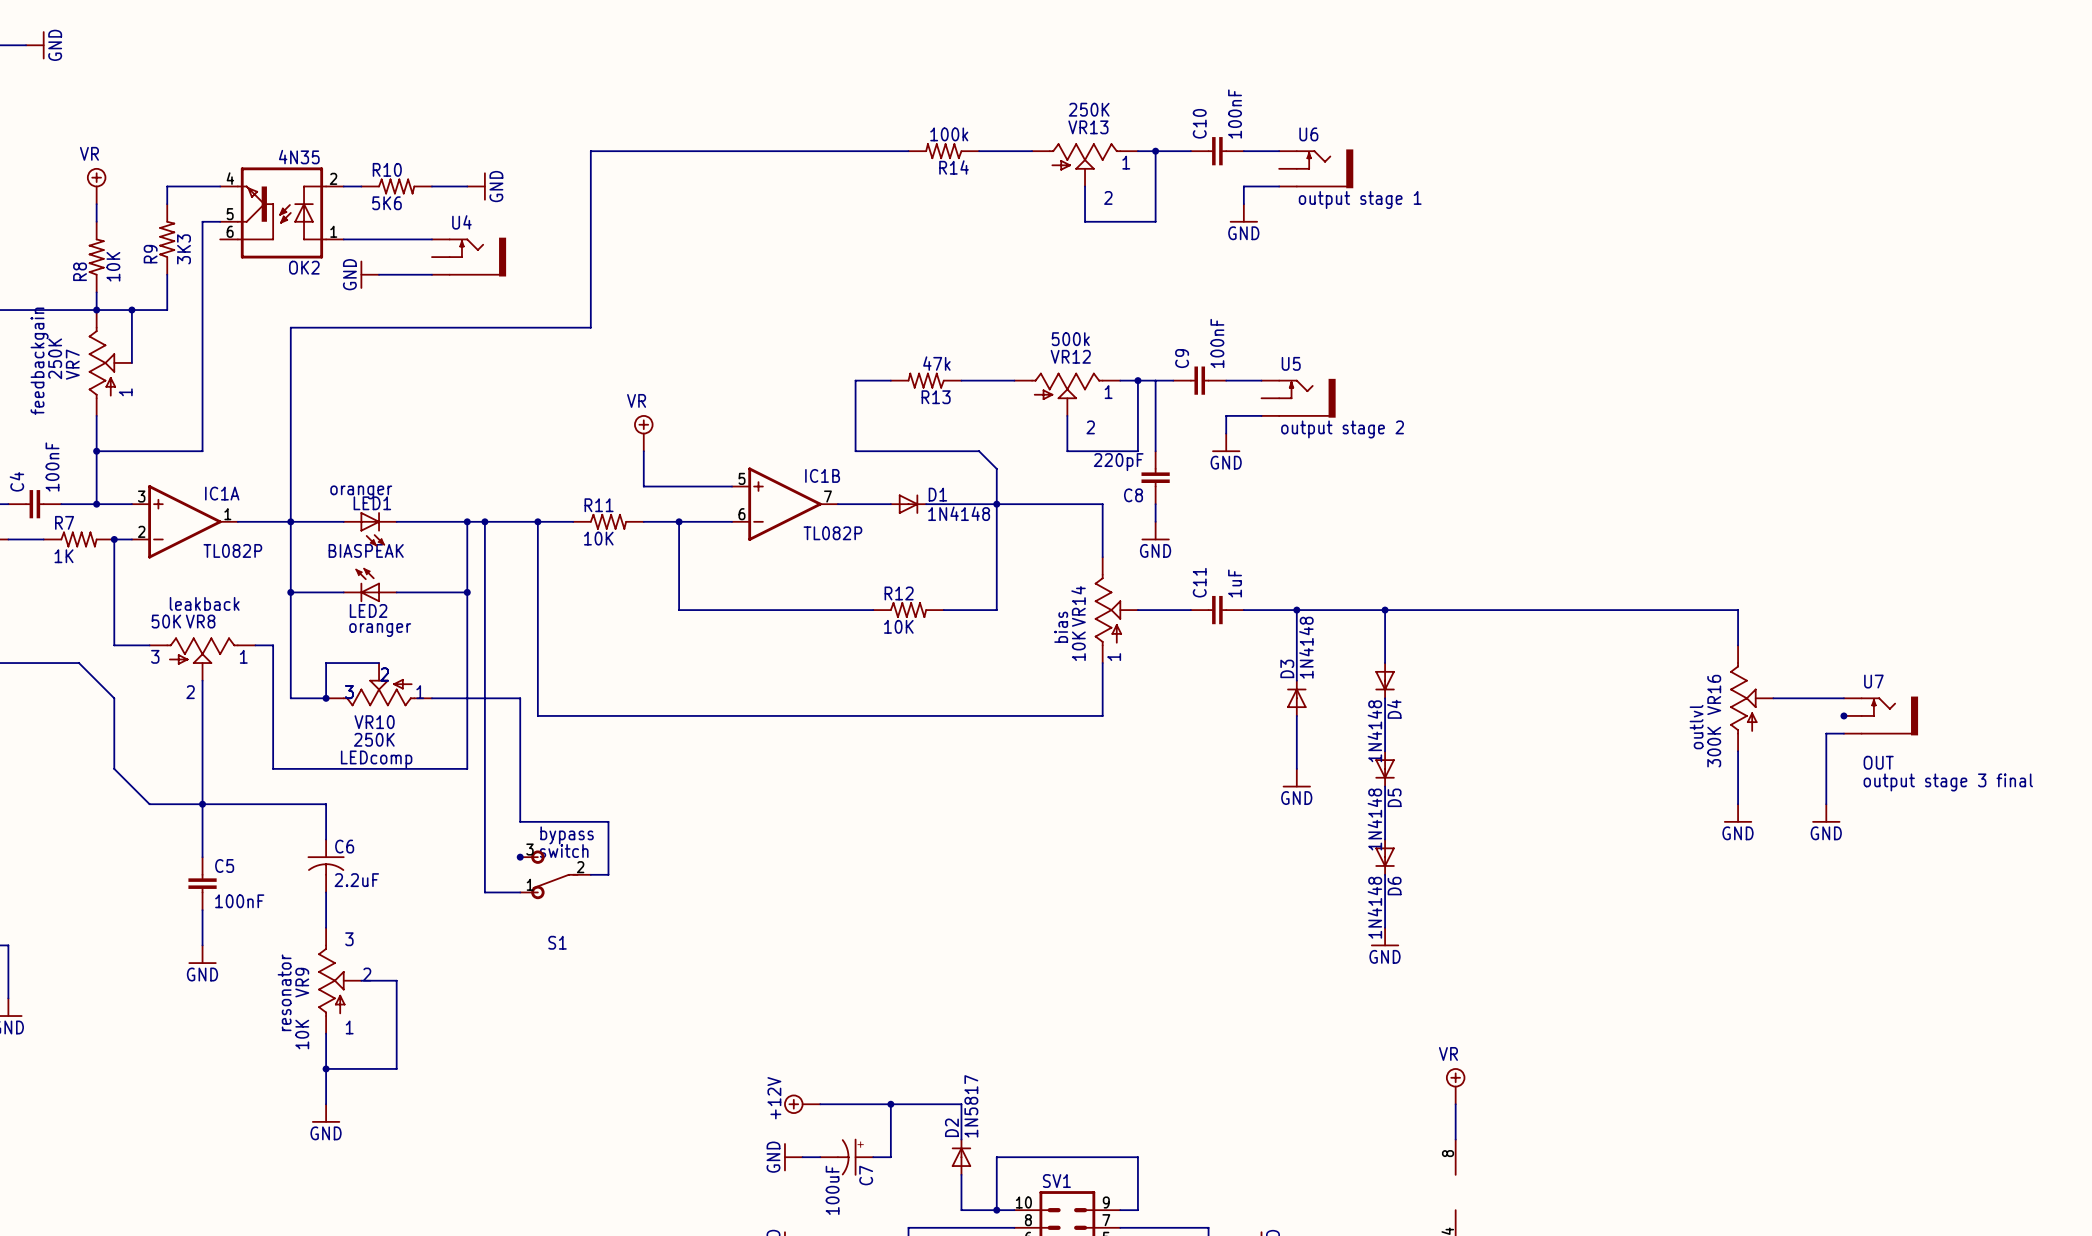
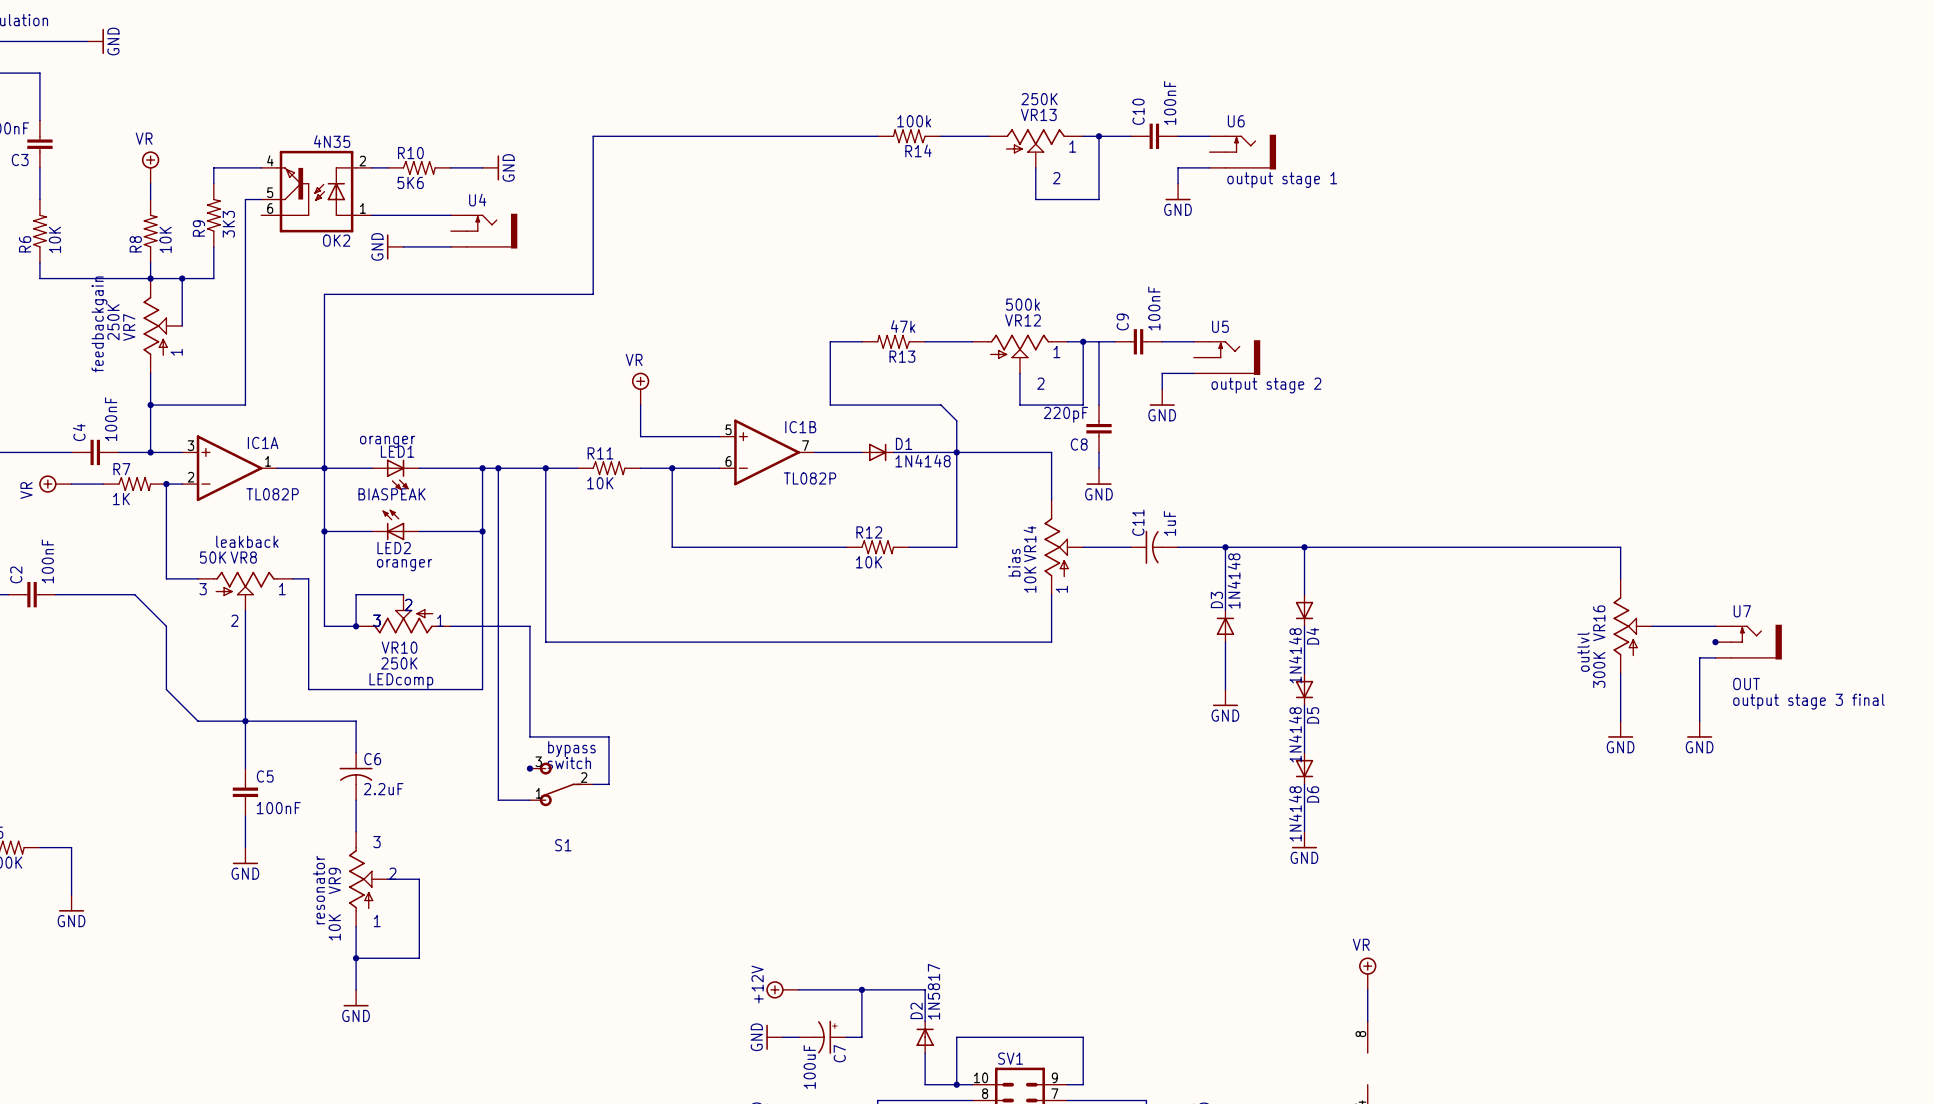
C11 symbol: [1190, 595, 1244, 625] -> [1130, 530, 1179, 564]

